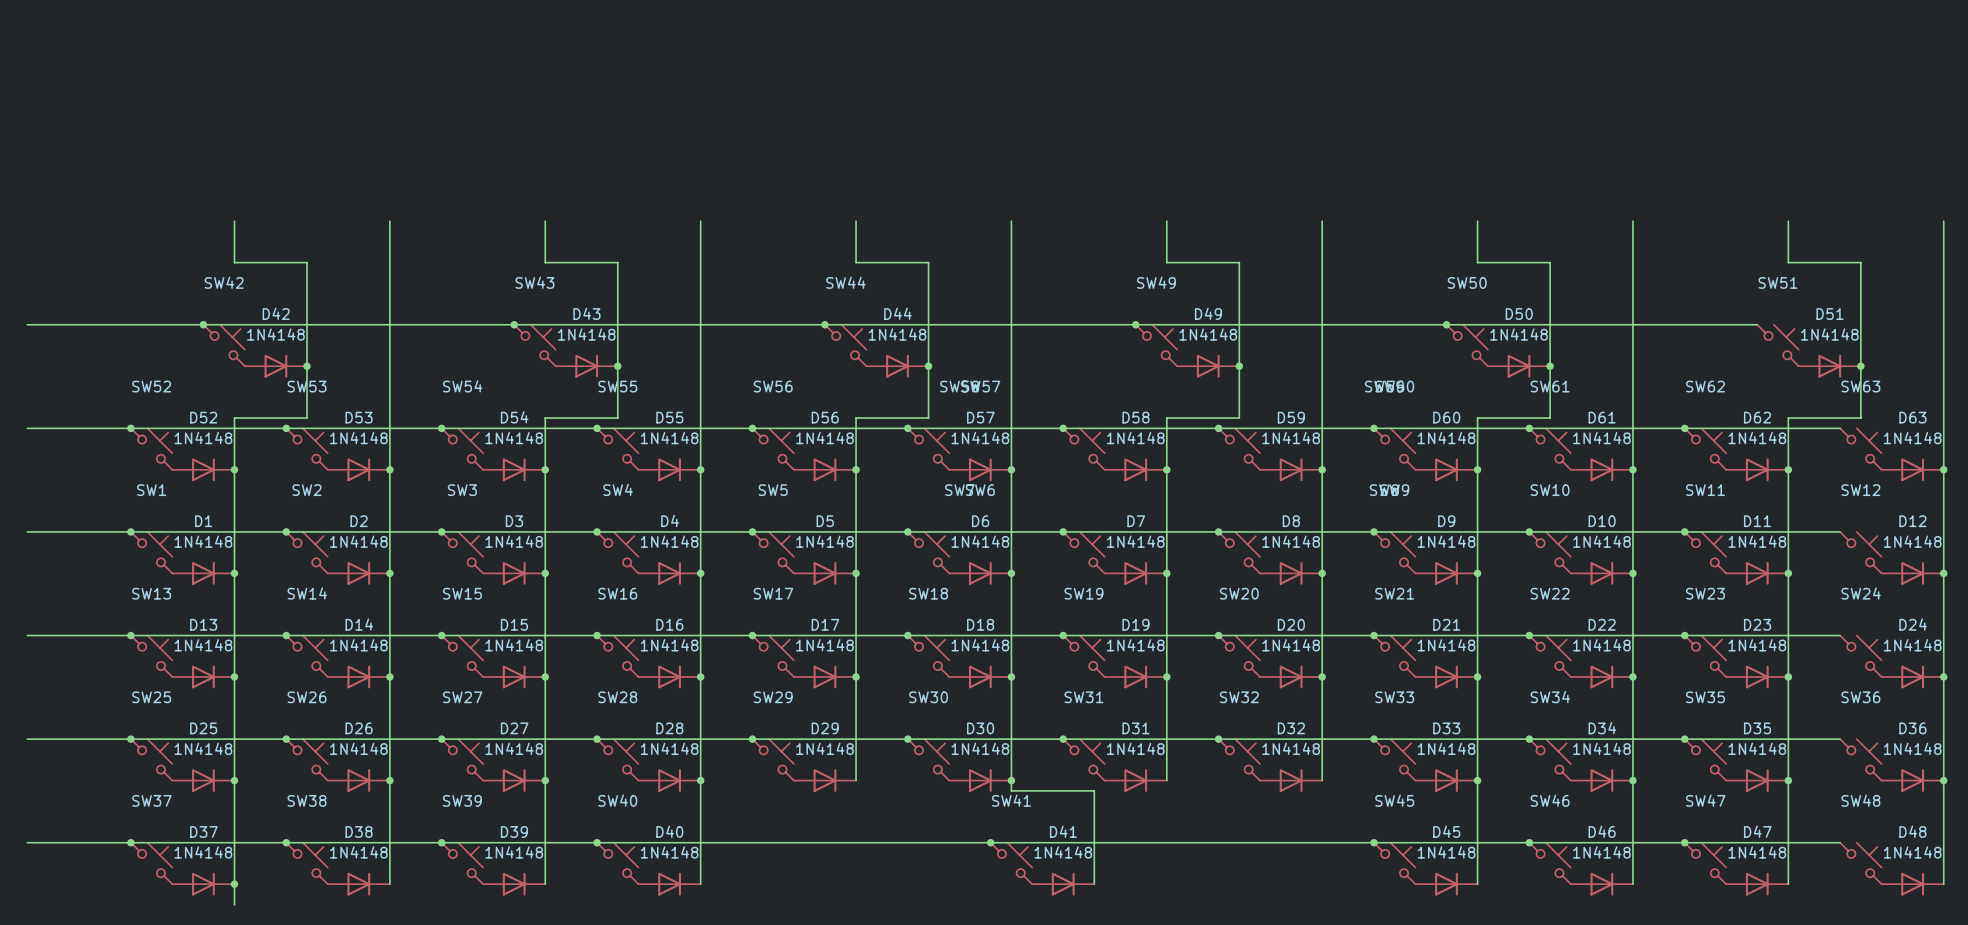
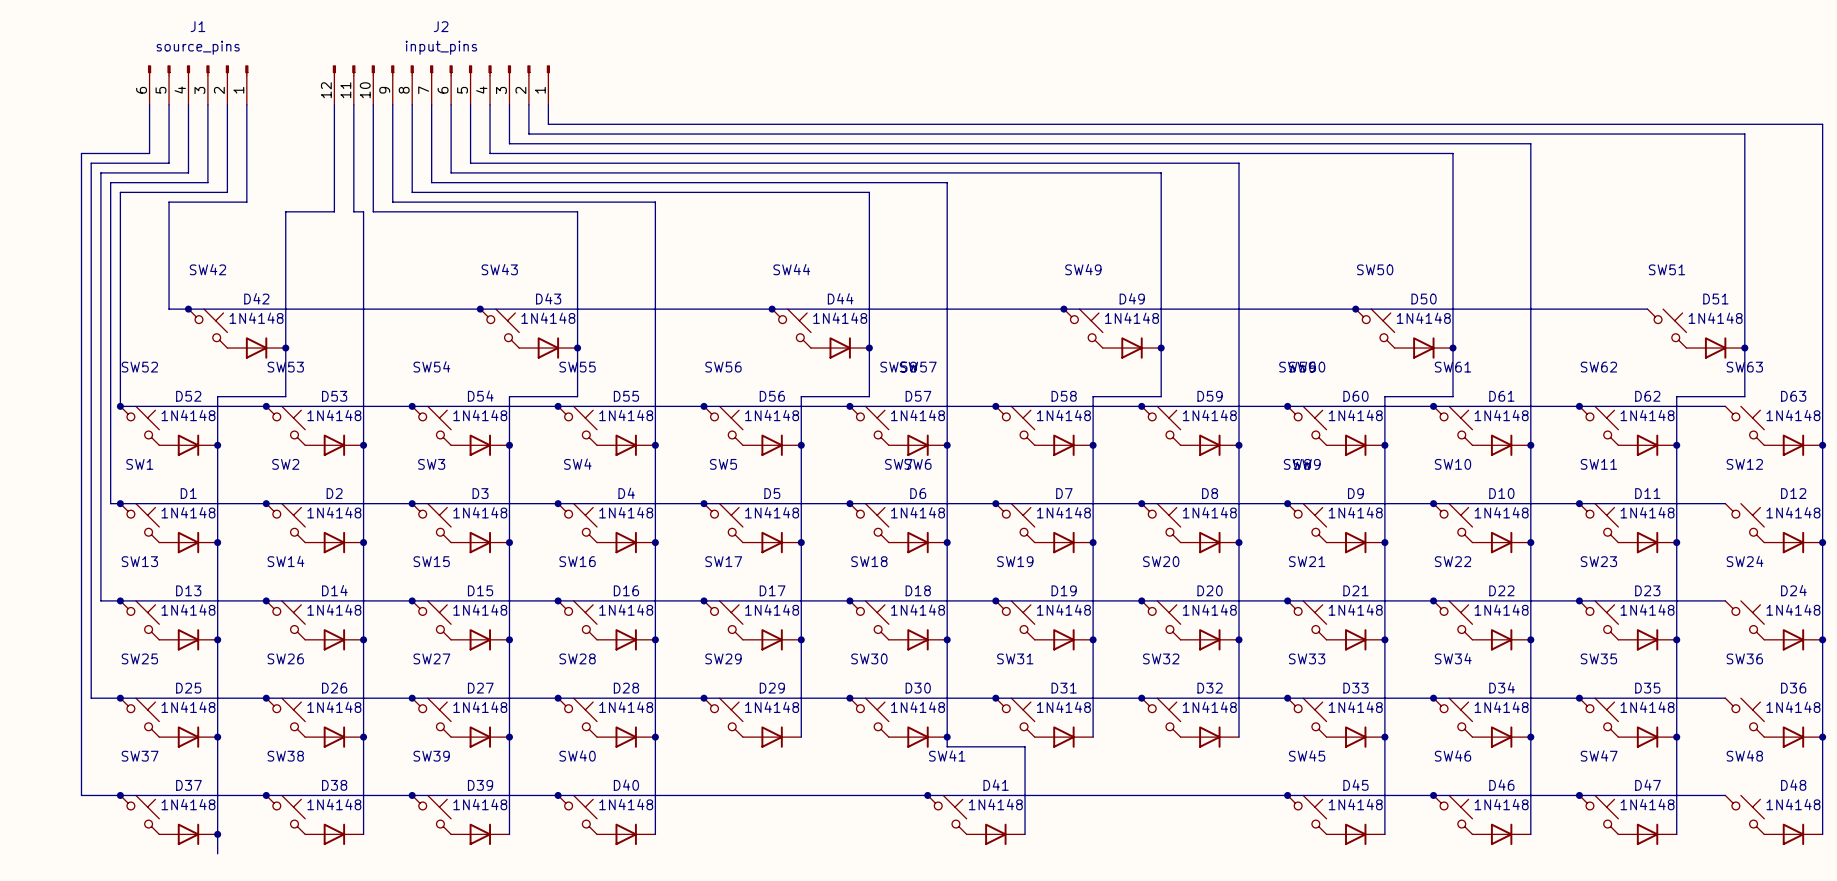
J1: none -> source_pins (198, 85)
J2: none -> input_pins (441, 85)
wire: none -> (353, 104) (353, 211) (363, 211)
wire: none -> (392, 104) (392, 202) (655, 202) (655, 211)
wire: none -> (431, 104) (431, 182) (947, 182) (947, 211)
wire: none -> (470, 104) (470, 163) (1239, 163) (1239, 211)
wire: none -> (509, 104) (509, 143) (1530, 143) (1530, 211)
wire: none -> (548, 104) (548, 124) (1822, 124) (1822, 211)
wire: (234, 221) (234, 262) (307, 262) -> (334, 104) (334, 211) (285, 211) (285, 250)
wire: (545, 221) (545, 262) (617, 262) -> (373, 104) (373, 211) (577, 211) (577, 250)
wire: (856, 221) (856, 262) (928, 262) -> (412, 104) (412, 192) (869, 192) (869, 250)
wire: (1166, 221) (1166, 262) (1239, 262) -> (451, 104) (451, 172) (1161, 172) (1161, 250)
wire: (1477, 221) (1477, 262) (1550, 262) -> (490, 104) (490, 153) (1453, 153) (1453, 250)
wire: (1788, 221) (1788, 262) (1860, 262) -> (528, 104) (528, 134) (1744, 134) (1744, 250)
wire: (27, 324) (182, 324) -> (246, 104) (246, 202) (169, 202) (169, 309)
wire: (27, 428) (130, 428) -> (227, 104) (227, 192) (120, 192) (120, 406)
wire: (27, 531) (120, 531) -> (207, 104) (207, 182) (110, 182) (110, 503)
wire: (27, 635) (110, 635) -> (188, 104) (188, 172) (100, 172) (100, 600)
wire: (27, 739) (99, 739) -> (169, 104) (169, 163) (91, 163) (91, 698)
wire: (27, 842) (89, 842) -> (149, 104) (149, 153) (81, 153) (81, 795)

